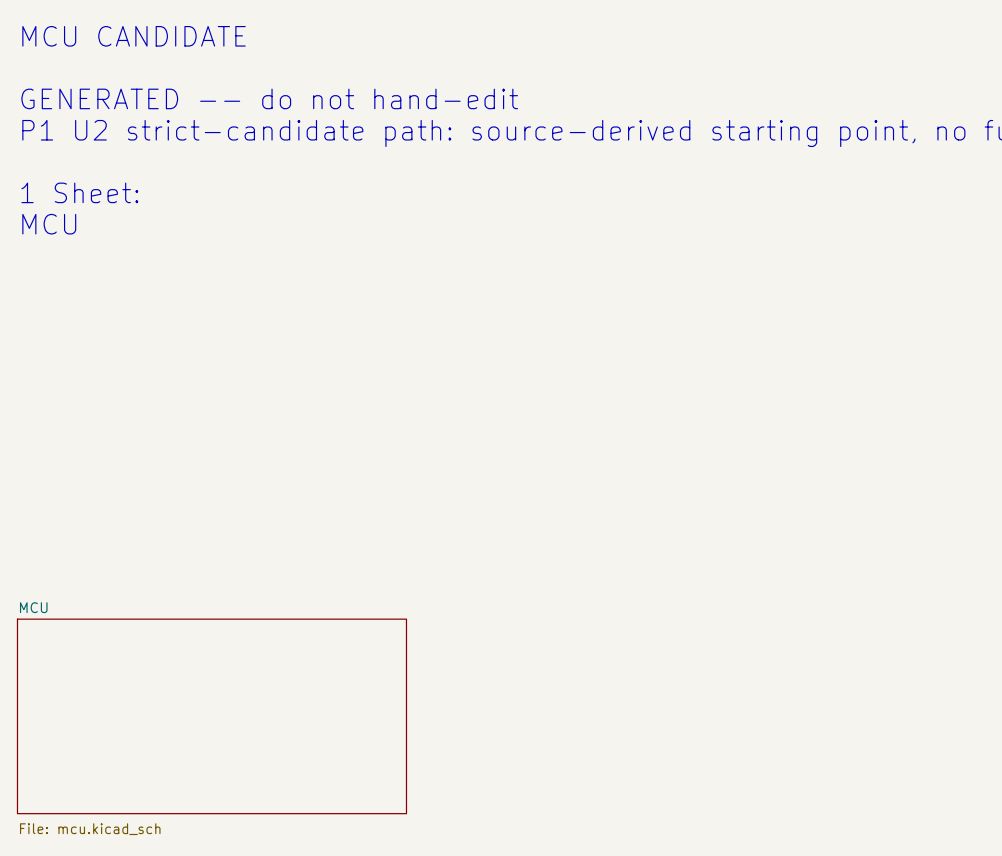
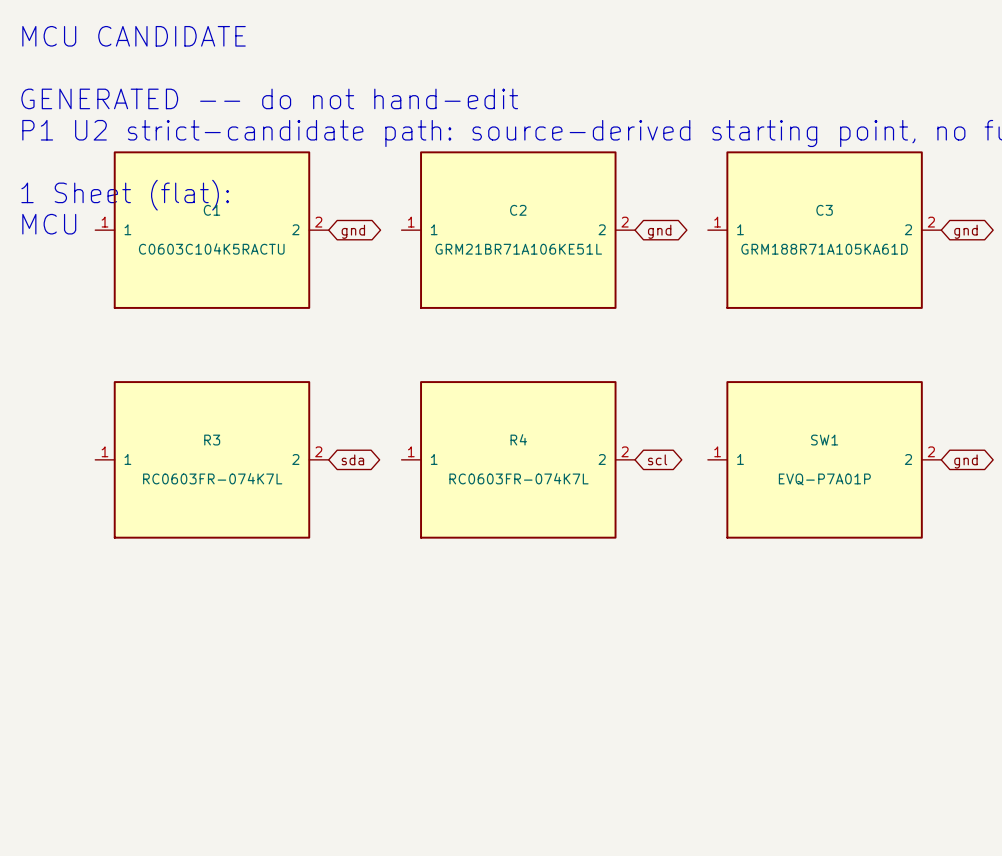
text: 1 Sheet: (79, 192) -> 1 Sheet (flat): (125, 195)
C1: none -> C0603C104K5RACTU (211, 230)
C2: none -> GRM21BR71A106KE51L (518, 230)
C3: none -> GRM188R71A105KA61D (824, 230)
global label: none -> gnd (353, 231)
global label: none -> gnd (659, 231)
global label: none -> gnd (965, 231)
R3: none -> RC0603FR-074K7L (211, 459)
global label: none -> sda (352, 459)
R4: none -> RC0603FR-074K7L (518, 459)
global label: none -> scl (657, 459)
SW1: none -> EVQ-P7A01P (824, 459)
global label: none -> gnd (965, 461)
sheet MCU: File: mcu.kicad_sch (211, 716) -> none

